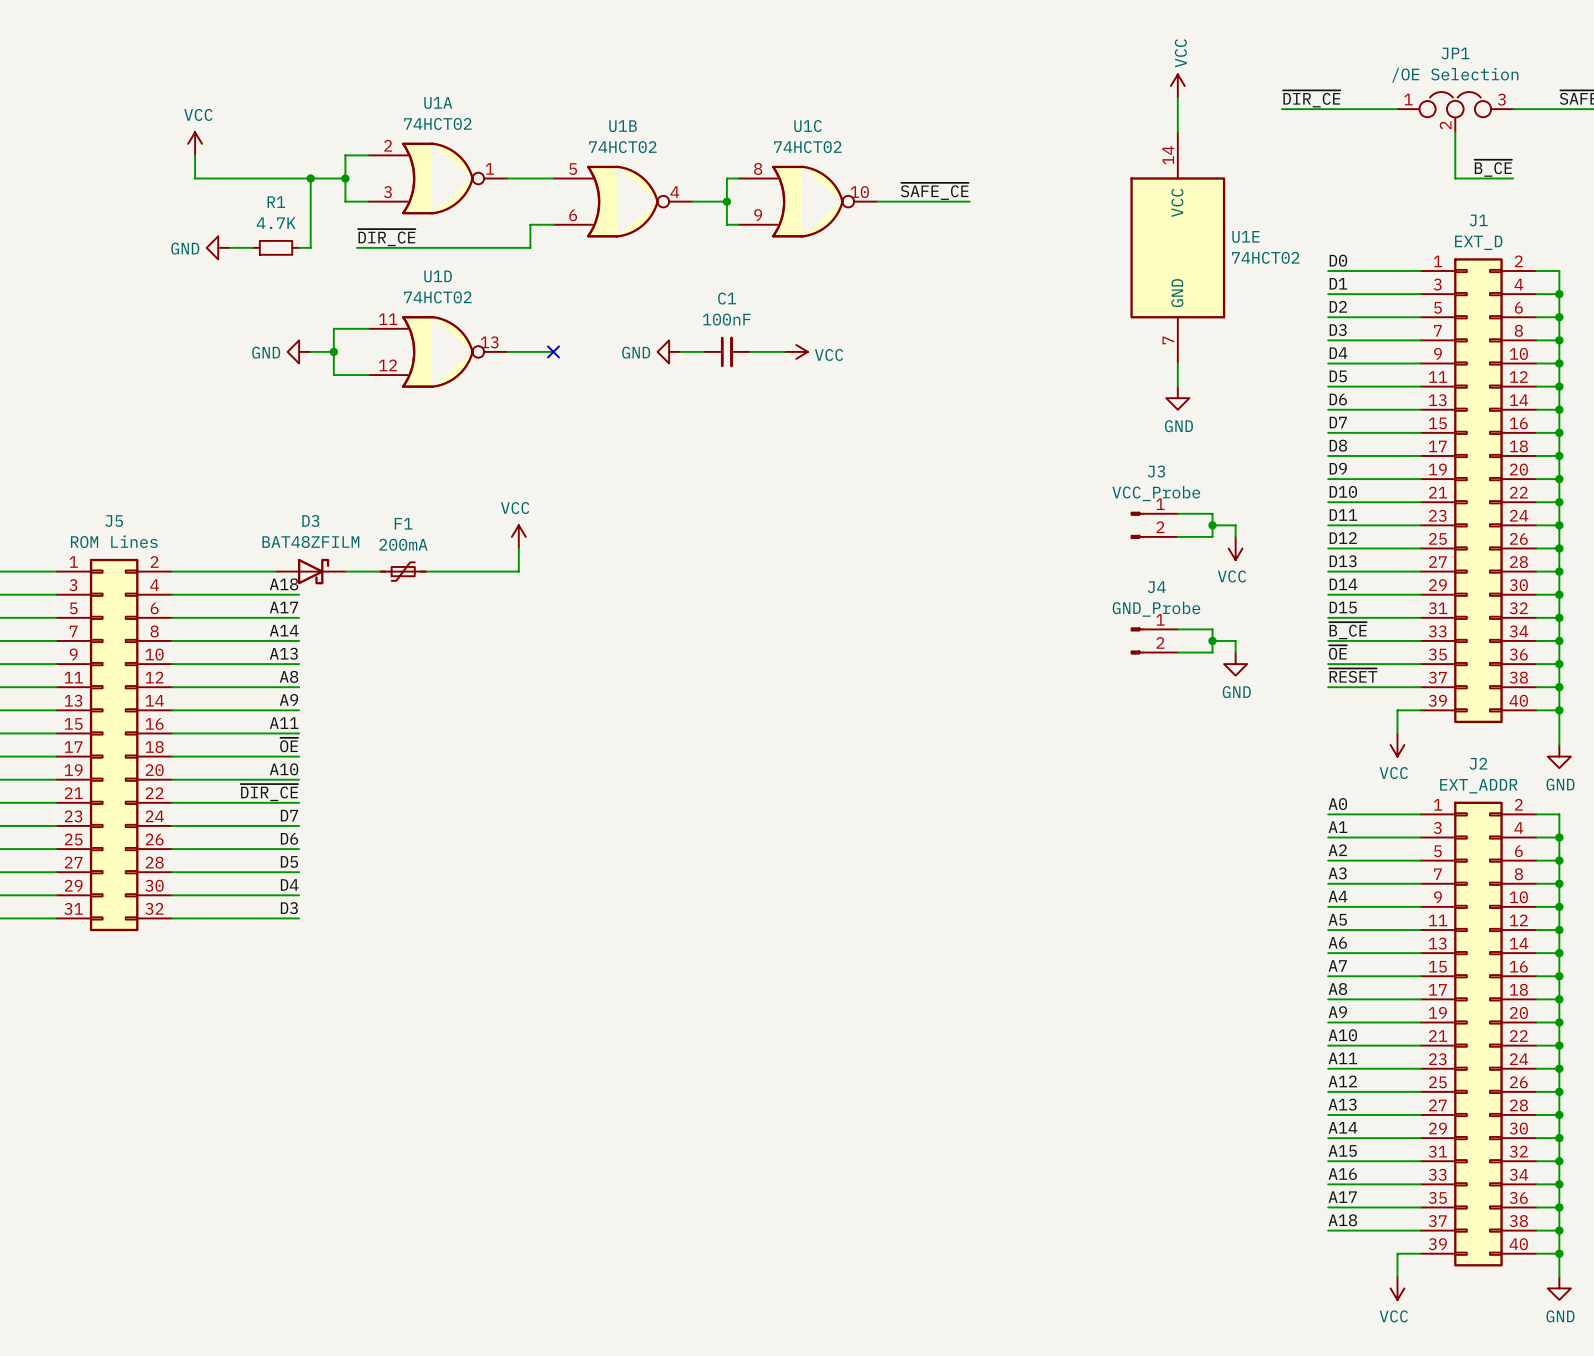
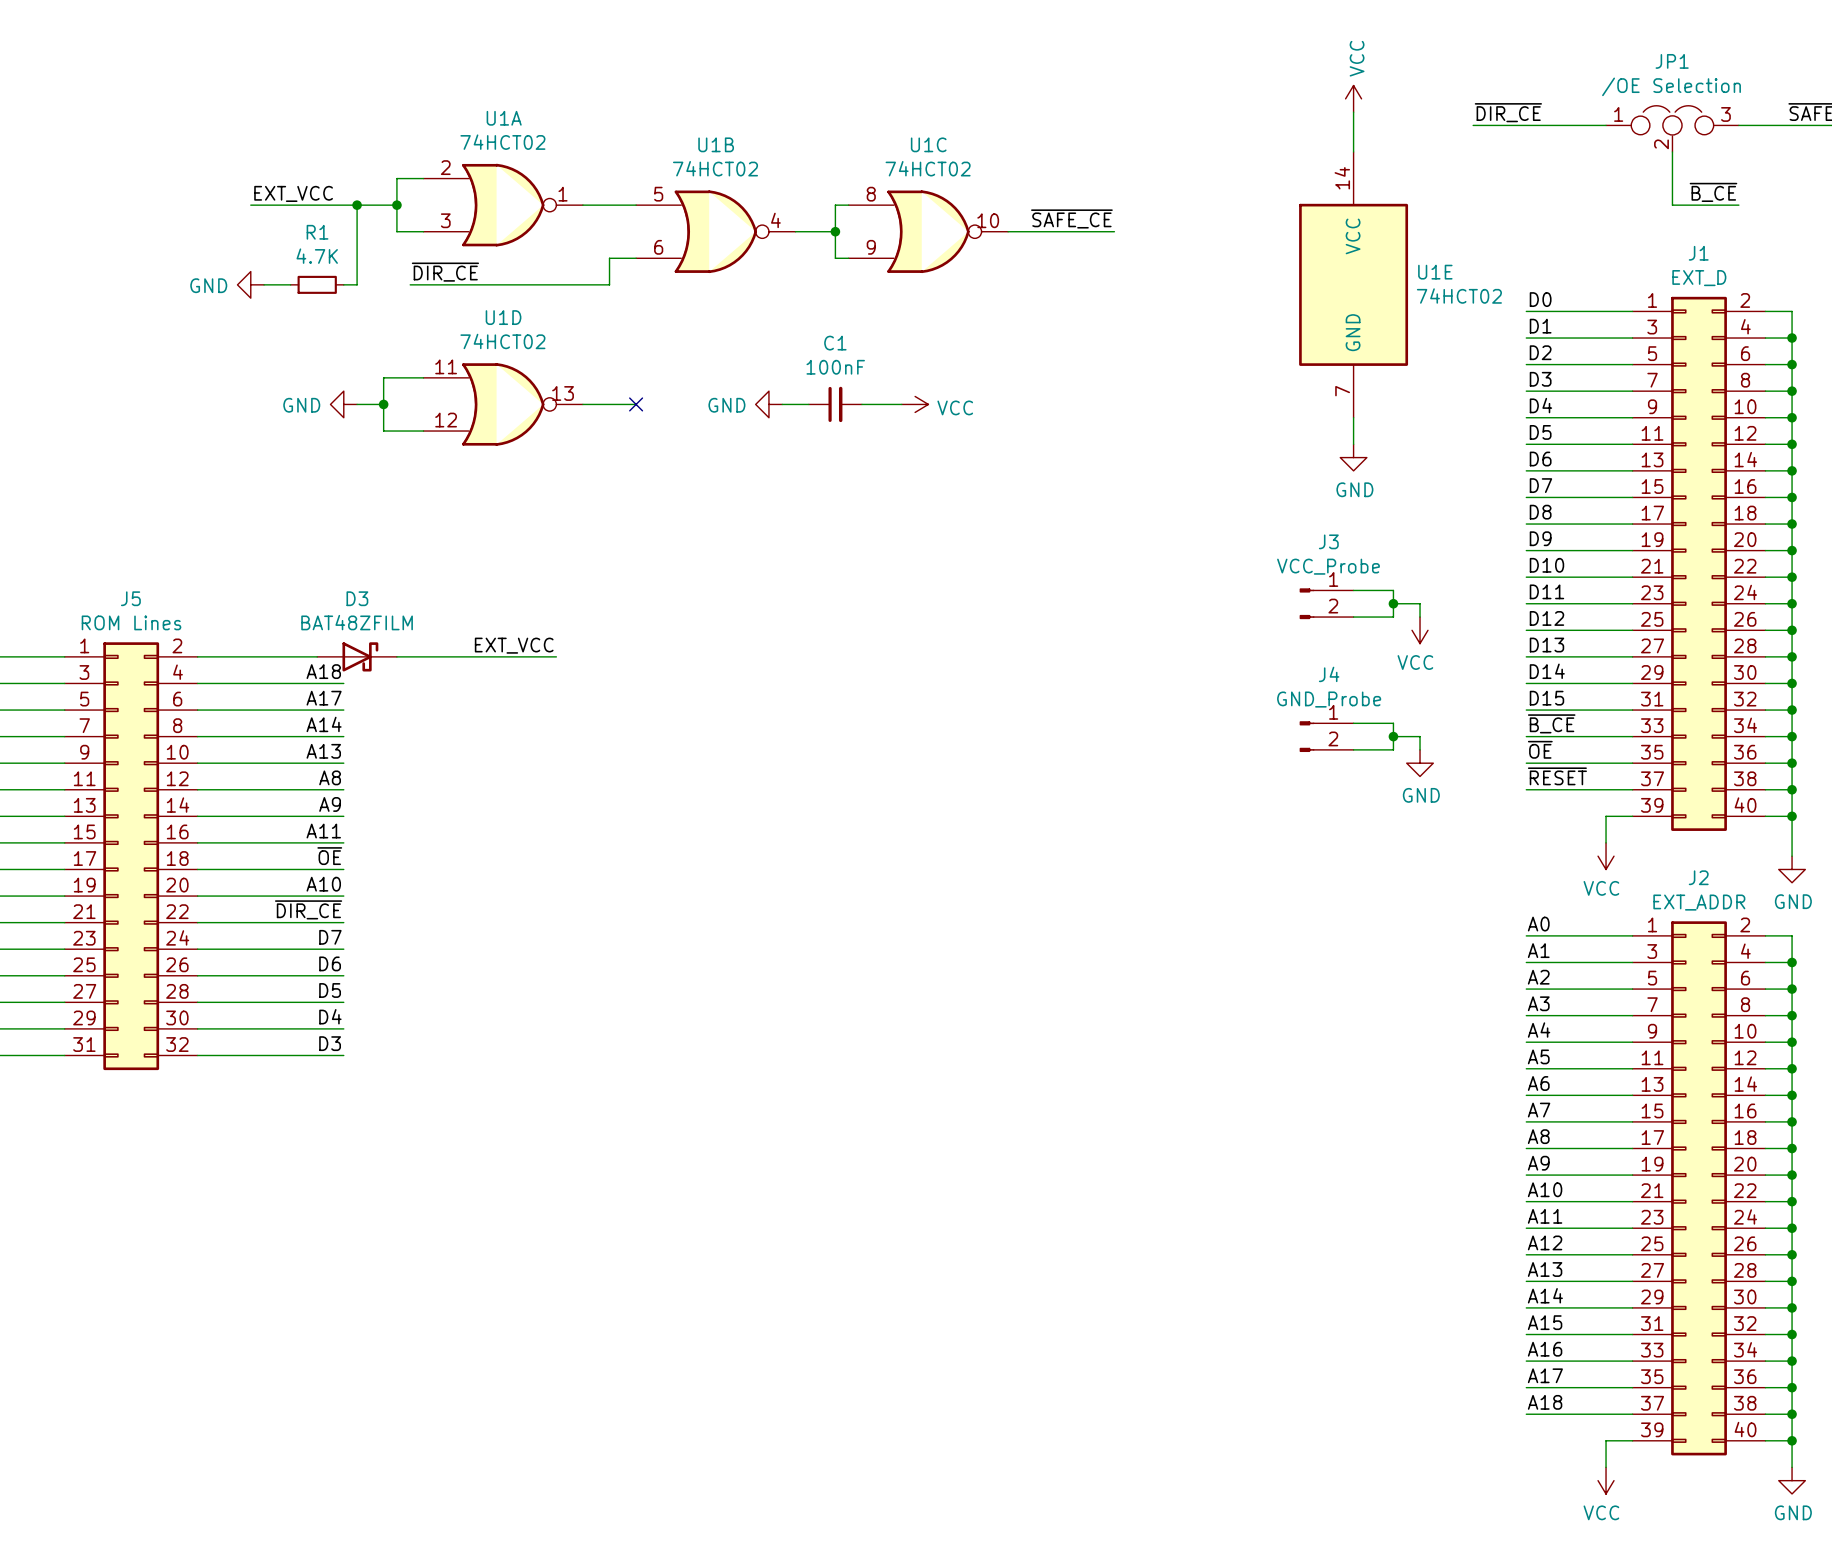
power symbol: VCC (195, 143) -> none
wire: (195, 155) (195, 178) (218, 178) -> none
label: none -> EXT_VCC (293, 193)
power symbol: VCC (518, 536) -> none
wire: (518, 548) (518, 571) (484, 571) -> none
label: none -> EXT_VCC (514, 645)
F1: 200mA (403, 571) -> none

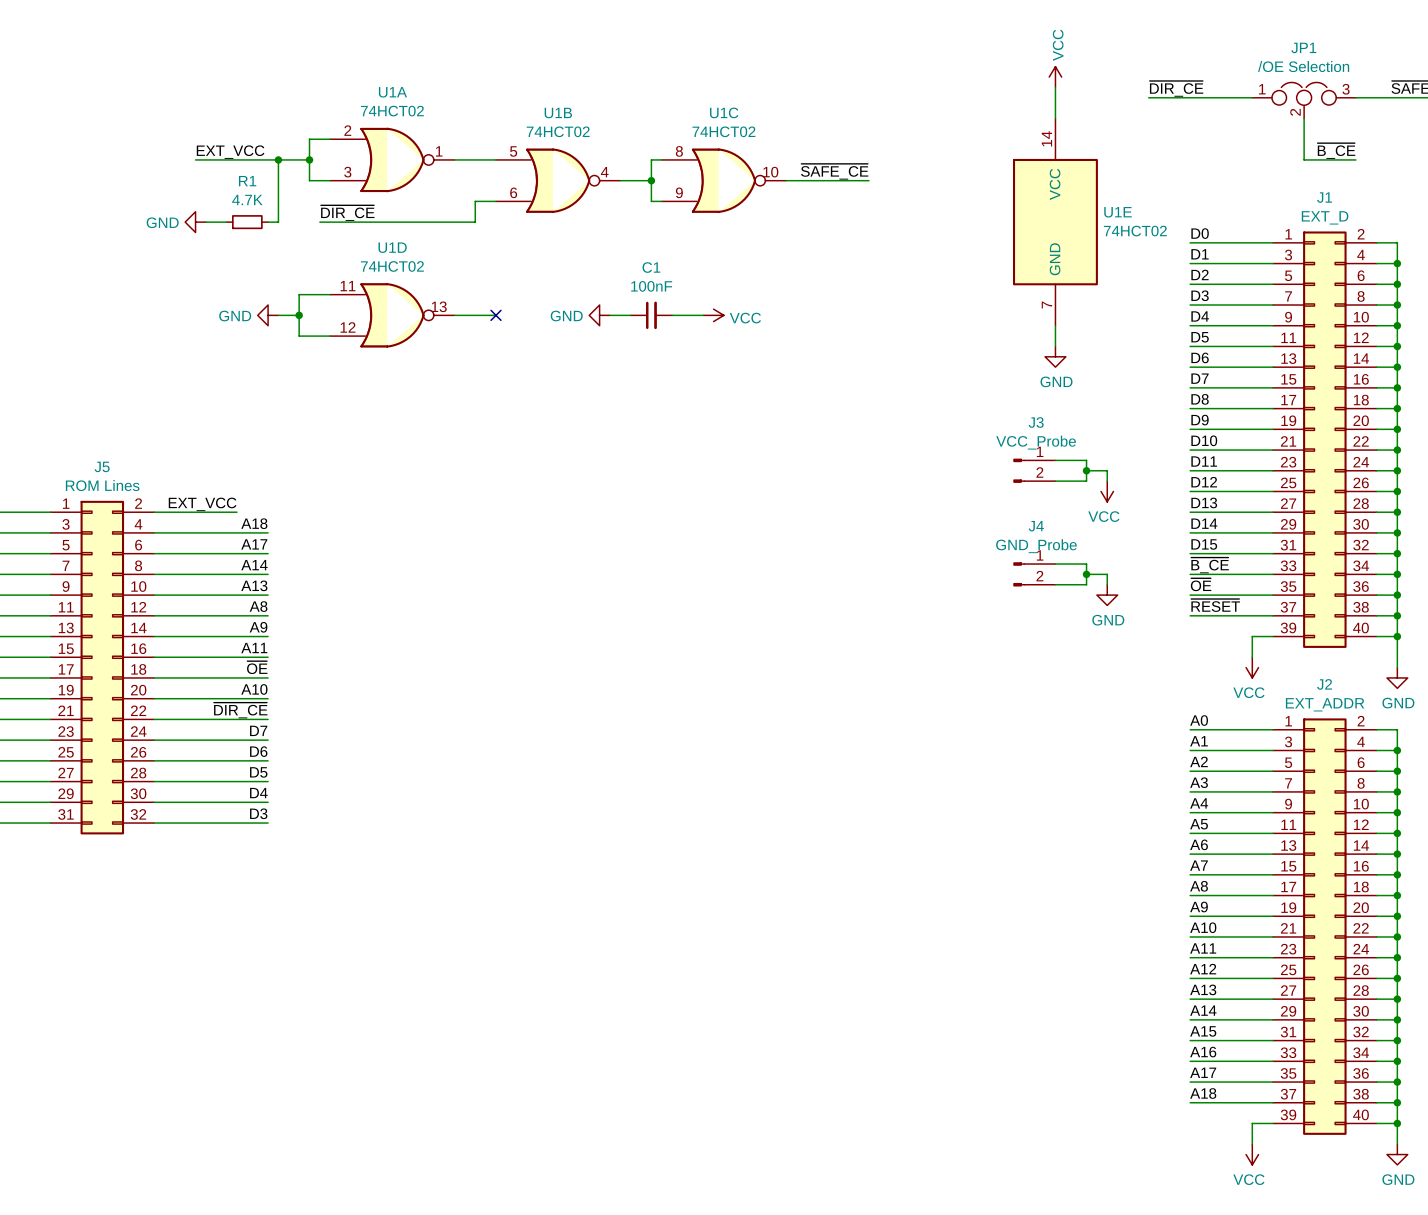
label position: EXT_VCC (514, 645) -> EXT_VCC (202, 504)
wire: (303, 656) (317, 656) -> none
D3: BAT48ZFILM (357, 656) -> none
wire: (396, 656) (556, 656) -> none

